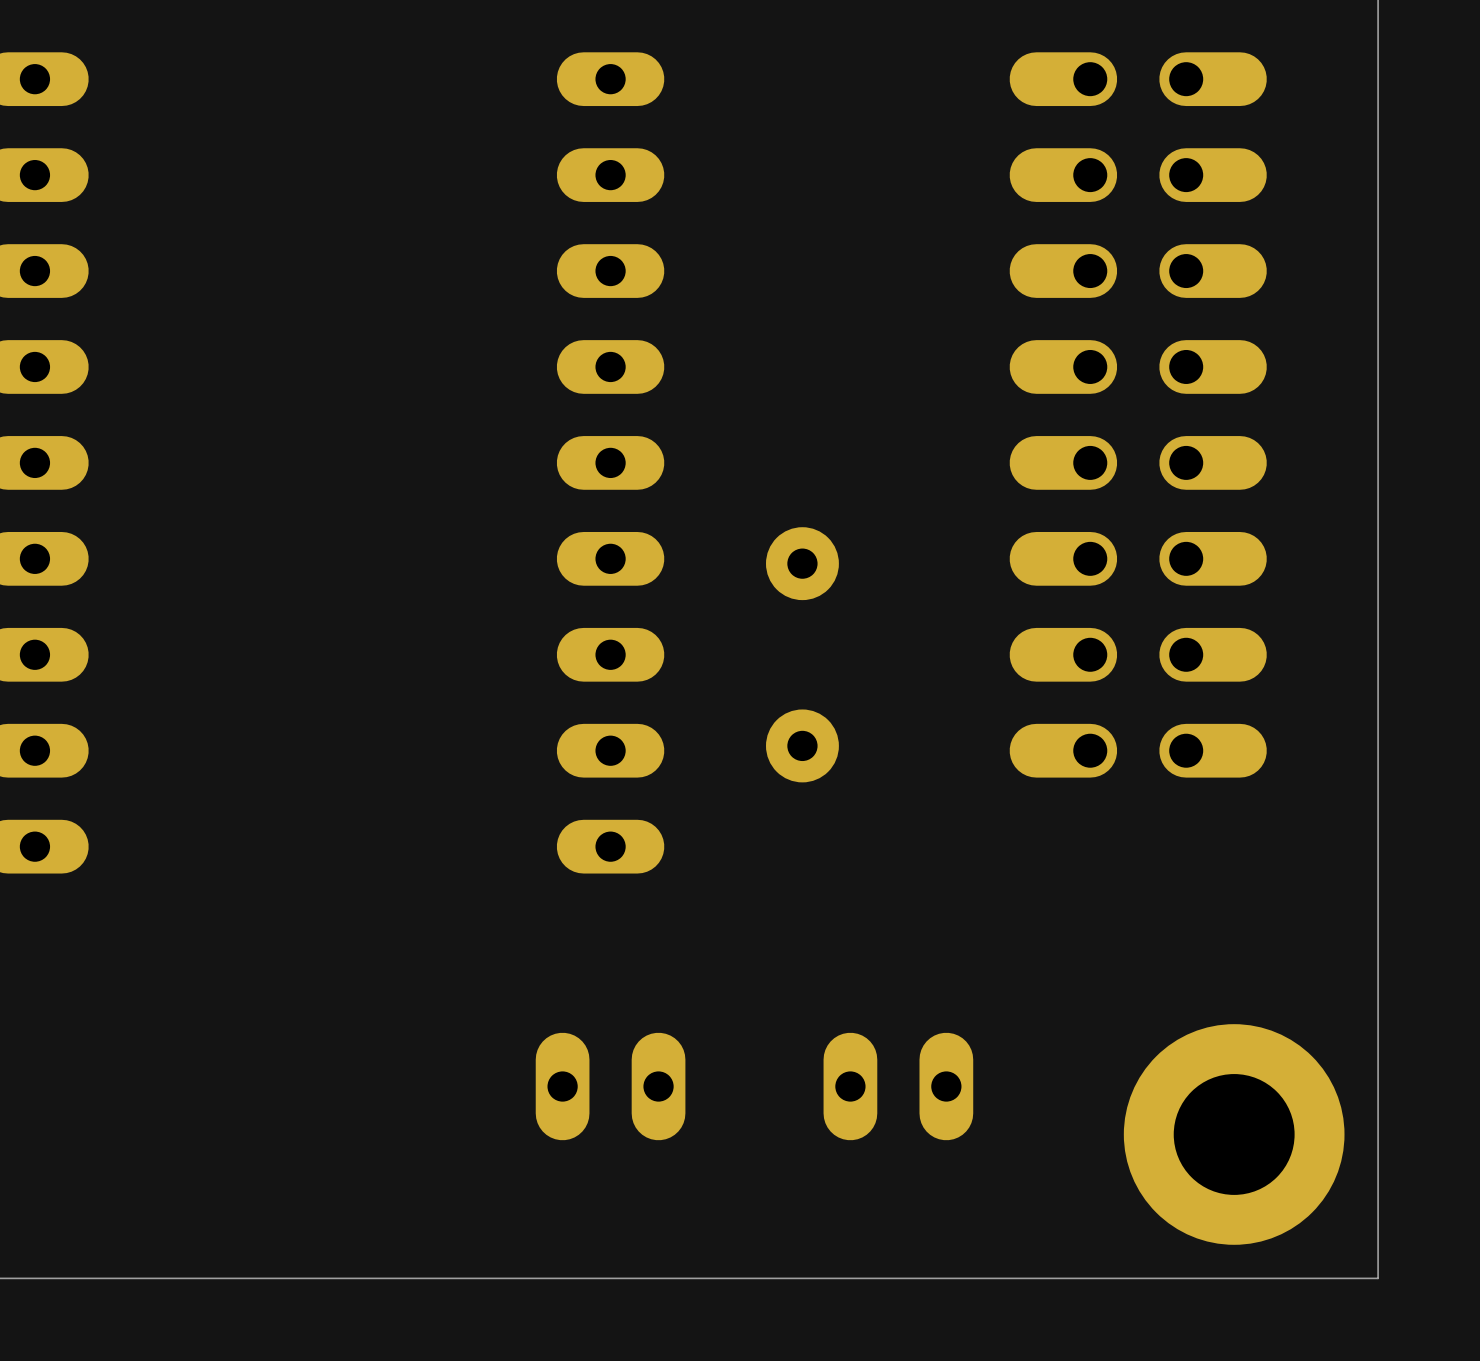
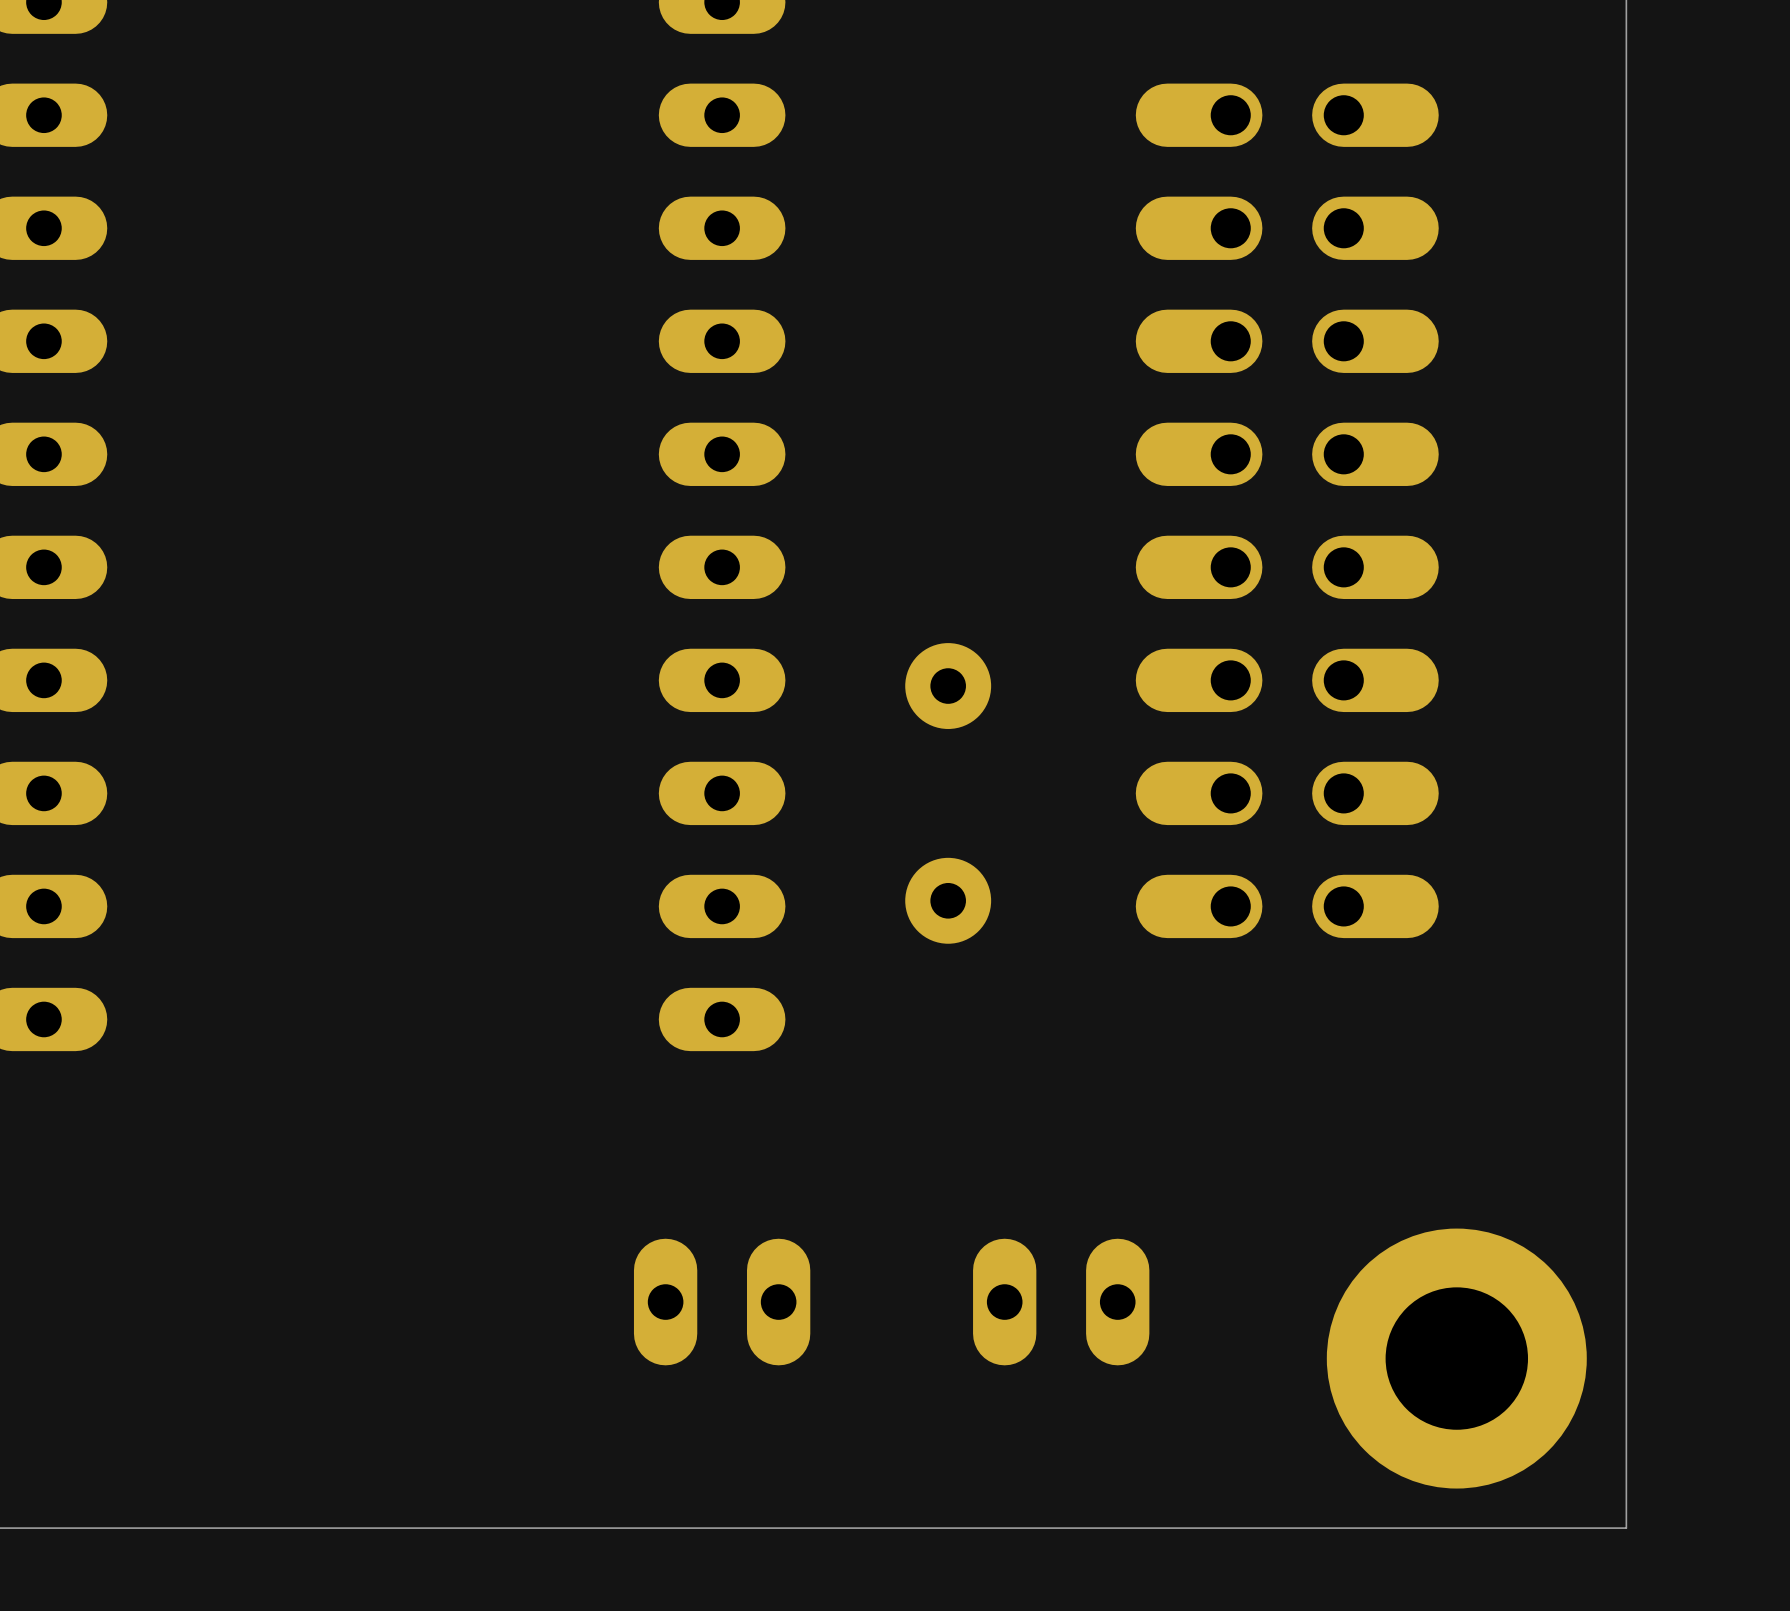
part position: (1138, 414) -> (1287, 510)

